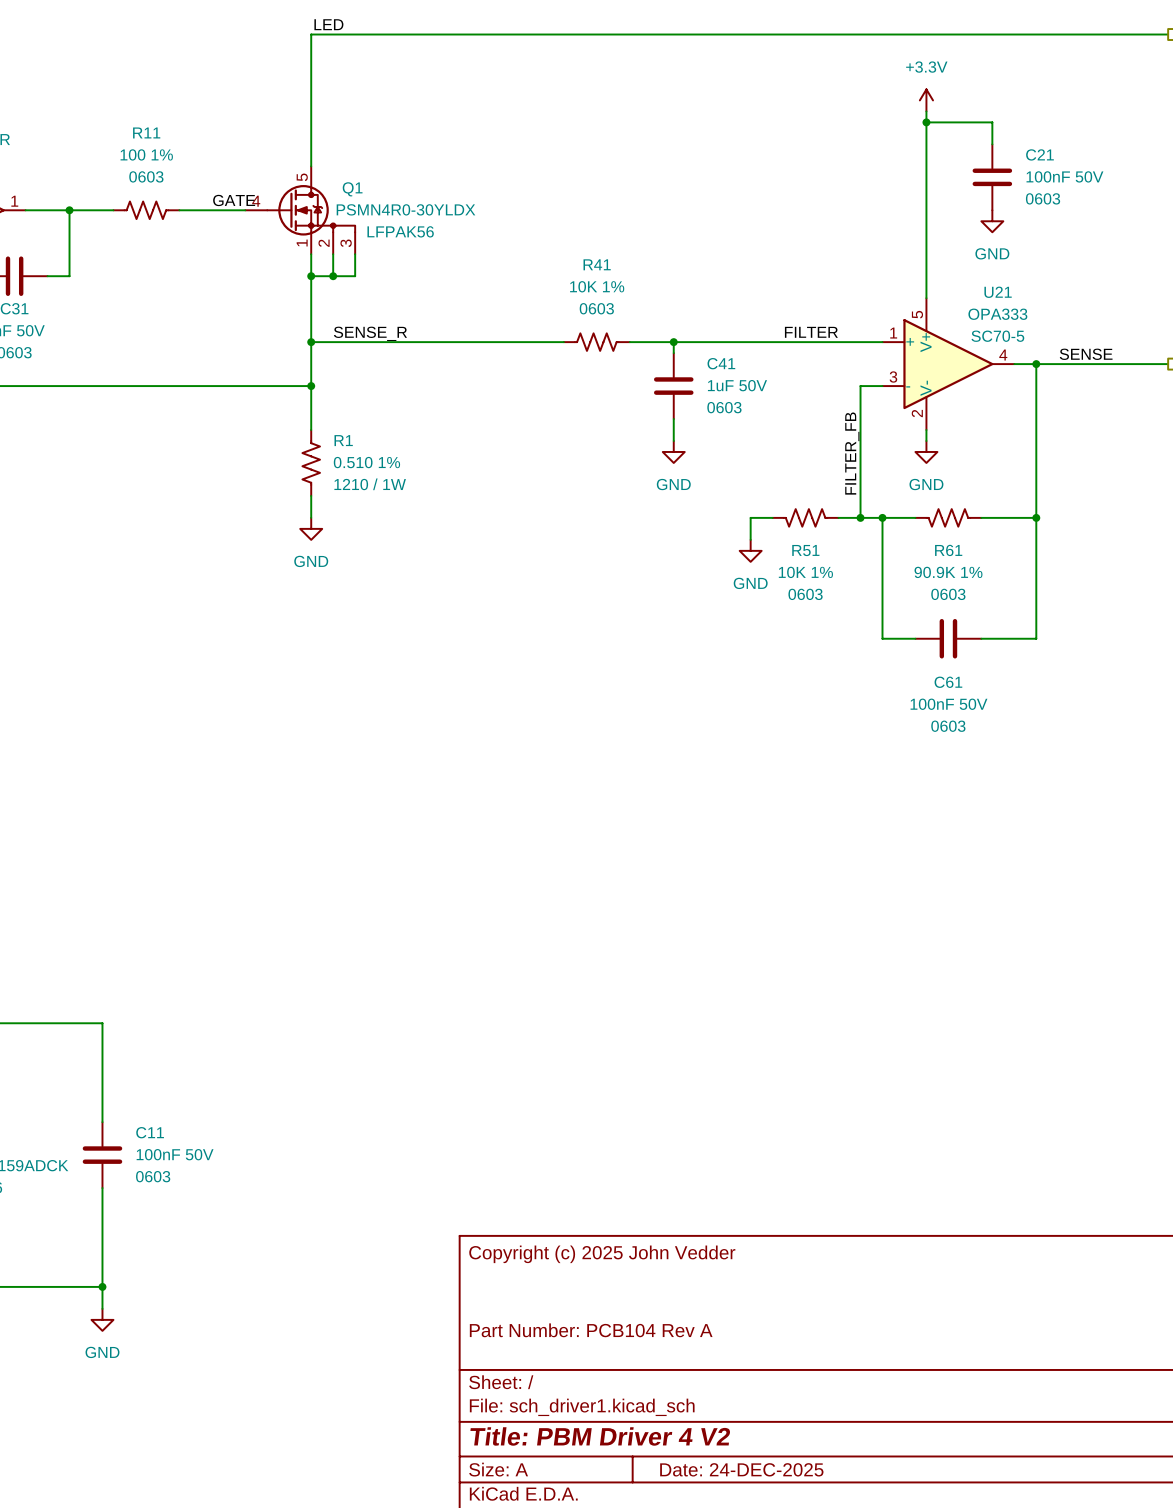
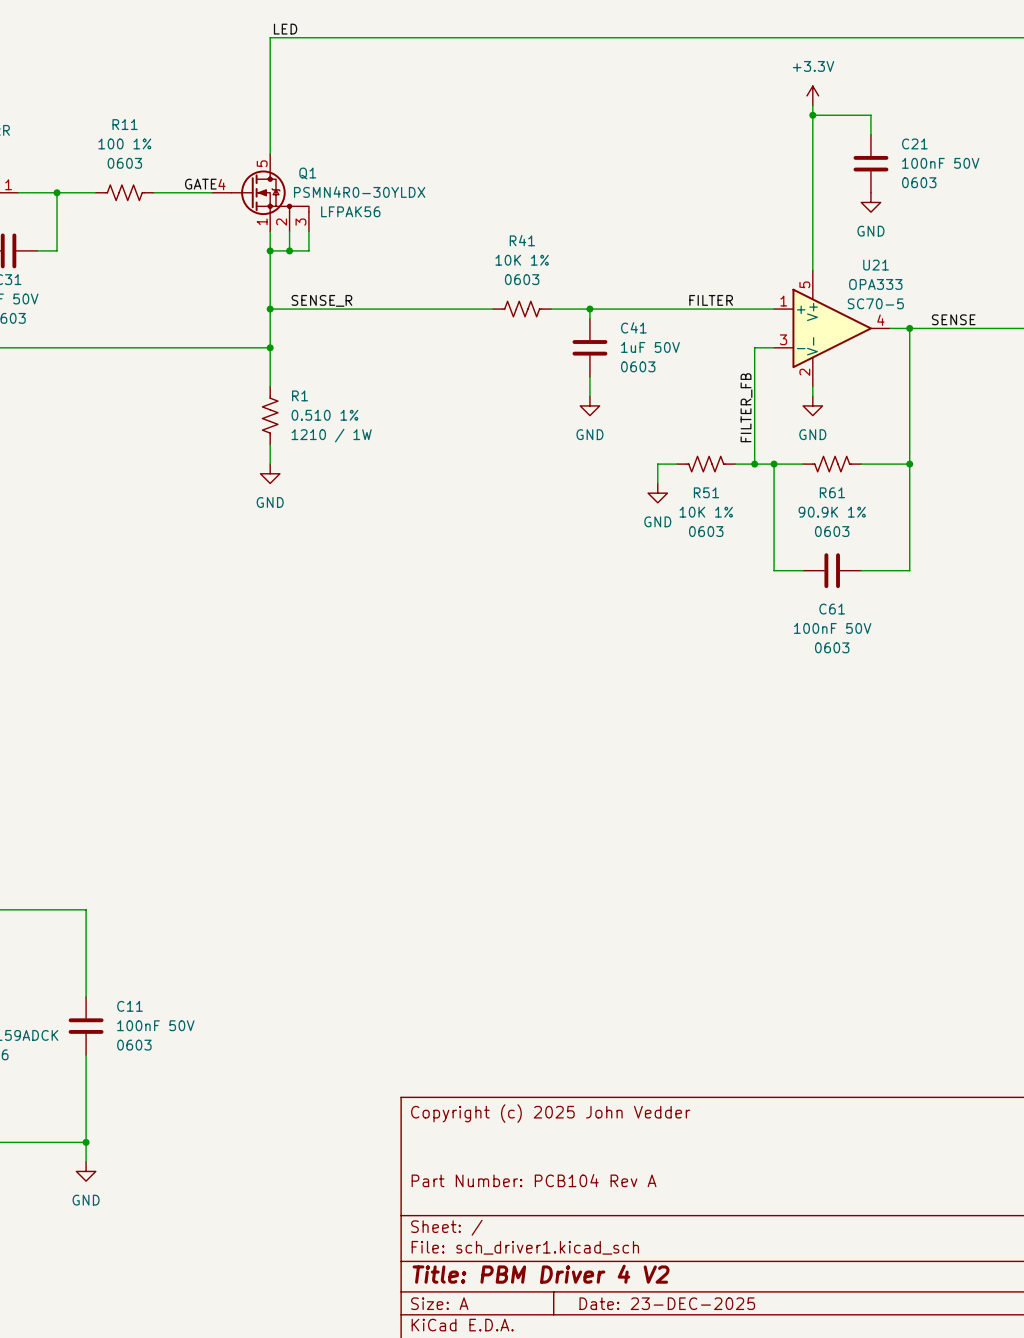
title block: Date: 24-DEC-2025 (741, 1469) -> Date: 23-DEC-2025 (667, 1303)

